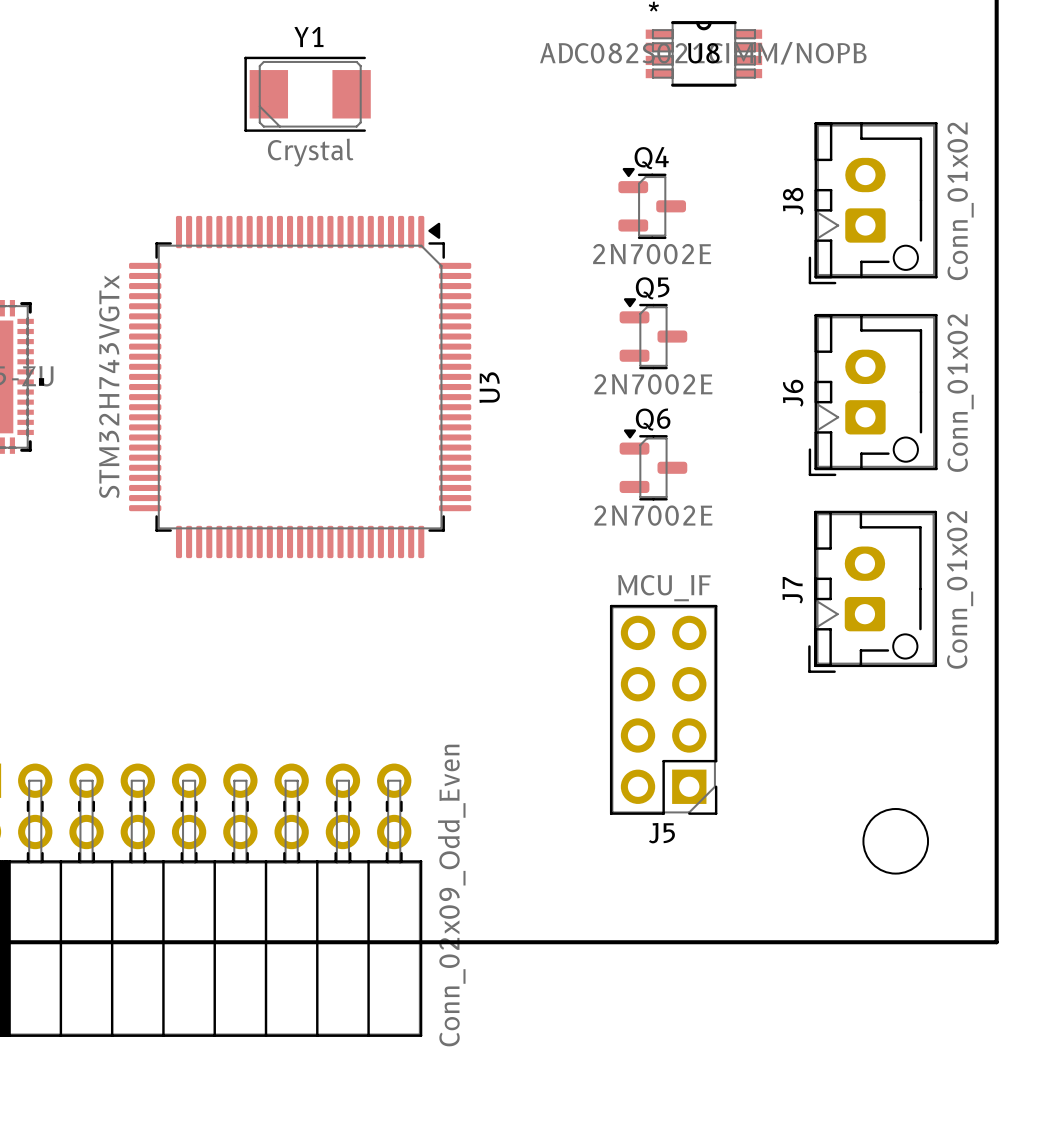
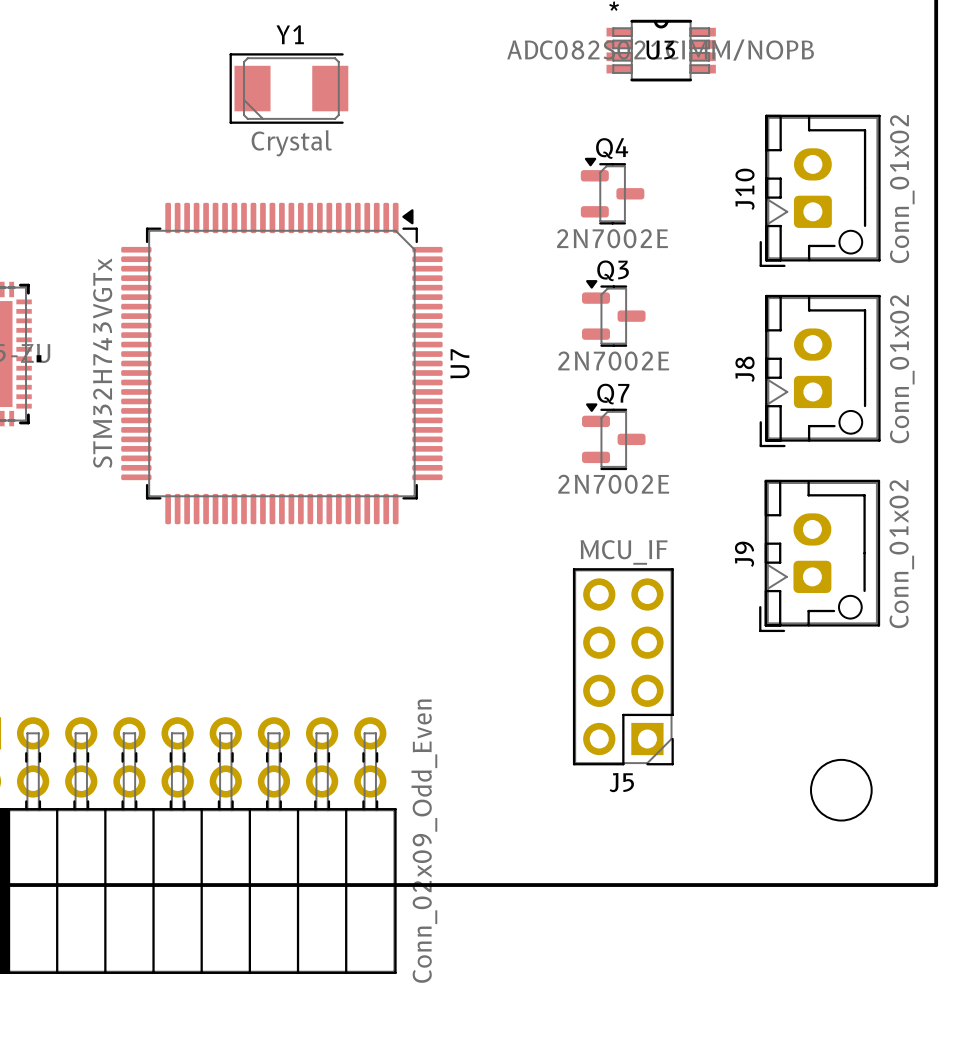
U8 name: U8 (703, 53) -> U3 (660, 50)
J8 name: J8 (793, 201) -> J10 (744, 189)
Q5 name: Q5 (652, 288) -> Q3 (613, 270)
U3 name: U3 (489, 387) -> U7 (459, 363)
J6 name: J6 (793, 393) -> J8 (744, 369)
Q6 name: Q6 (653, 419) -> Q7 (613, 394)
J7 name: J7 (792, 590) -> J9 (744, 554)

